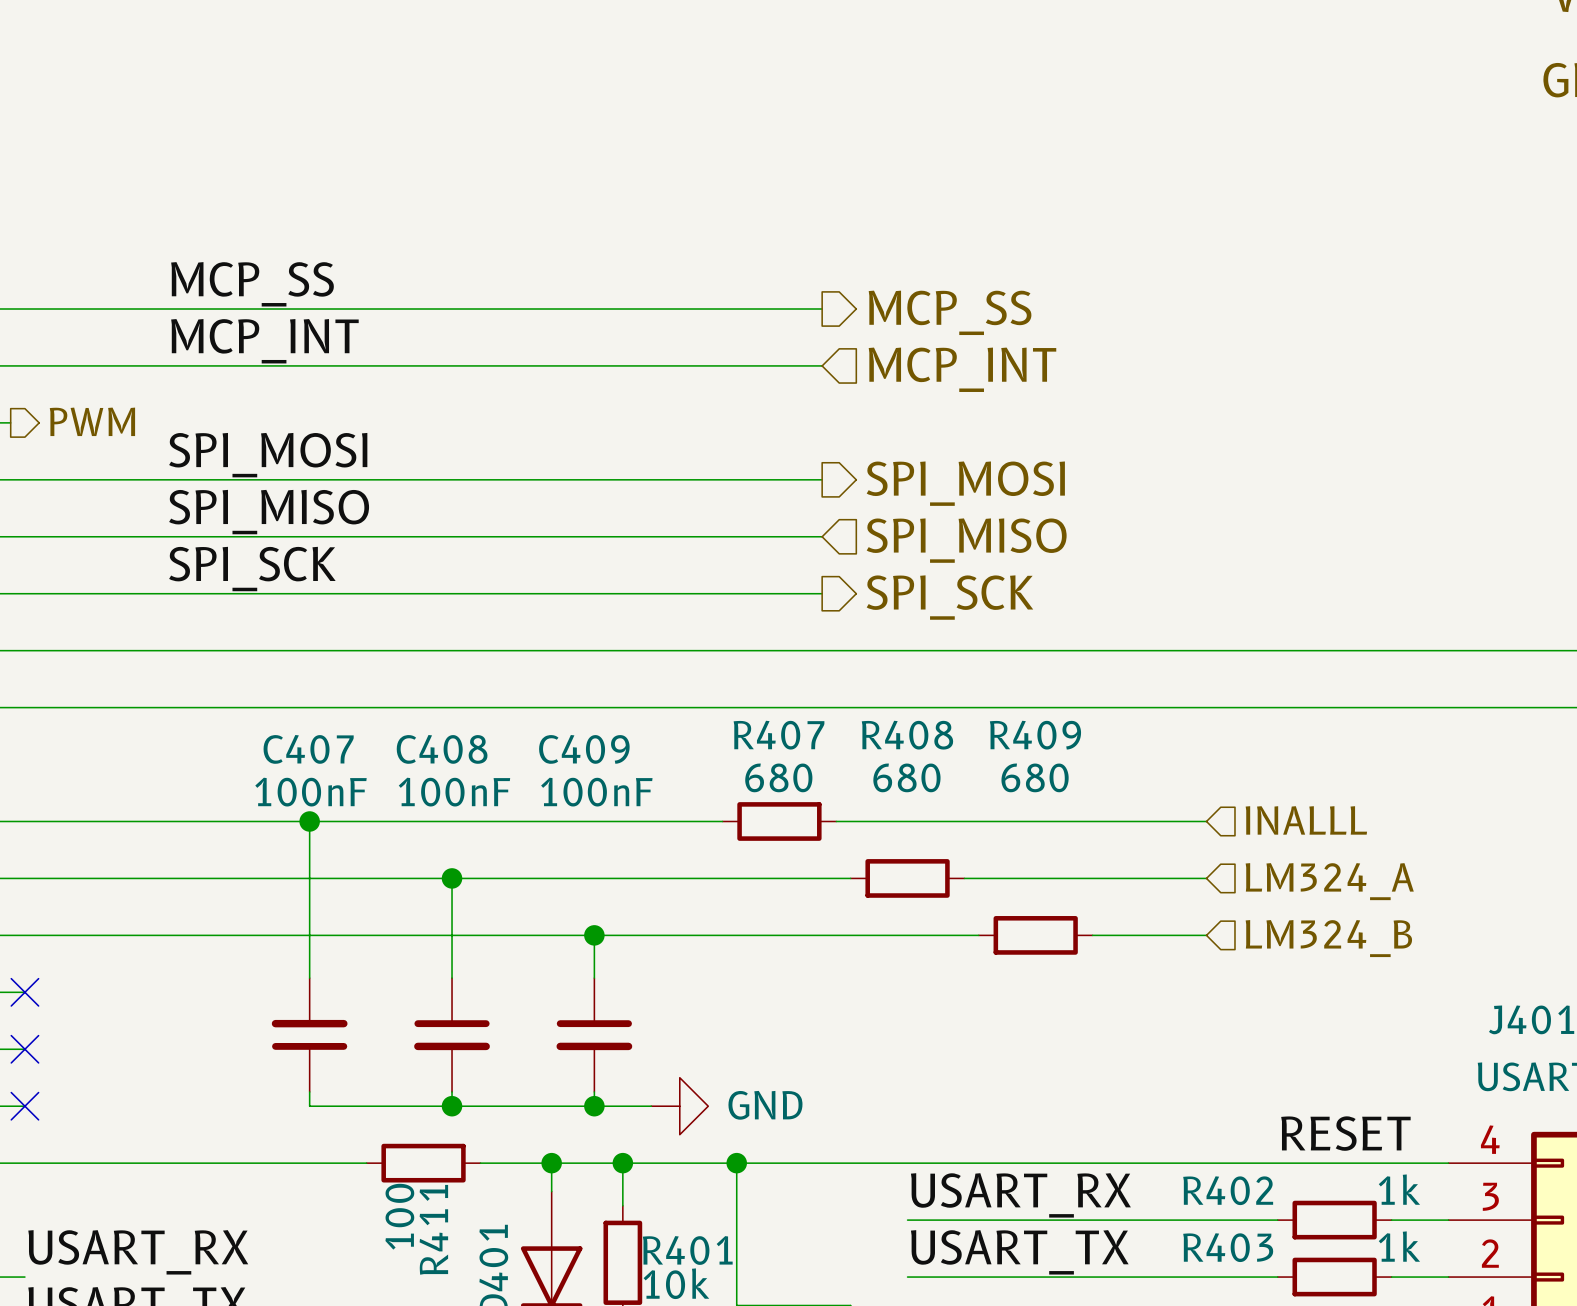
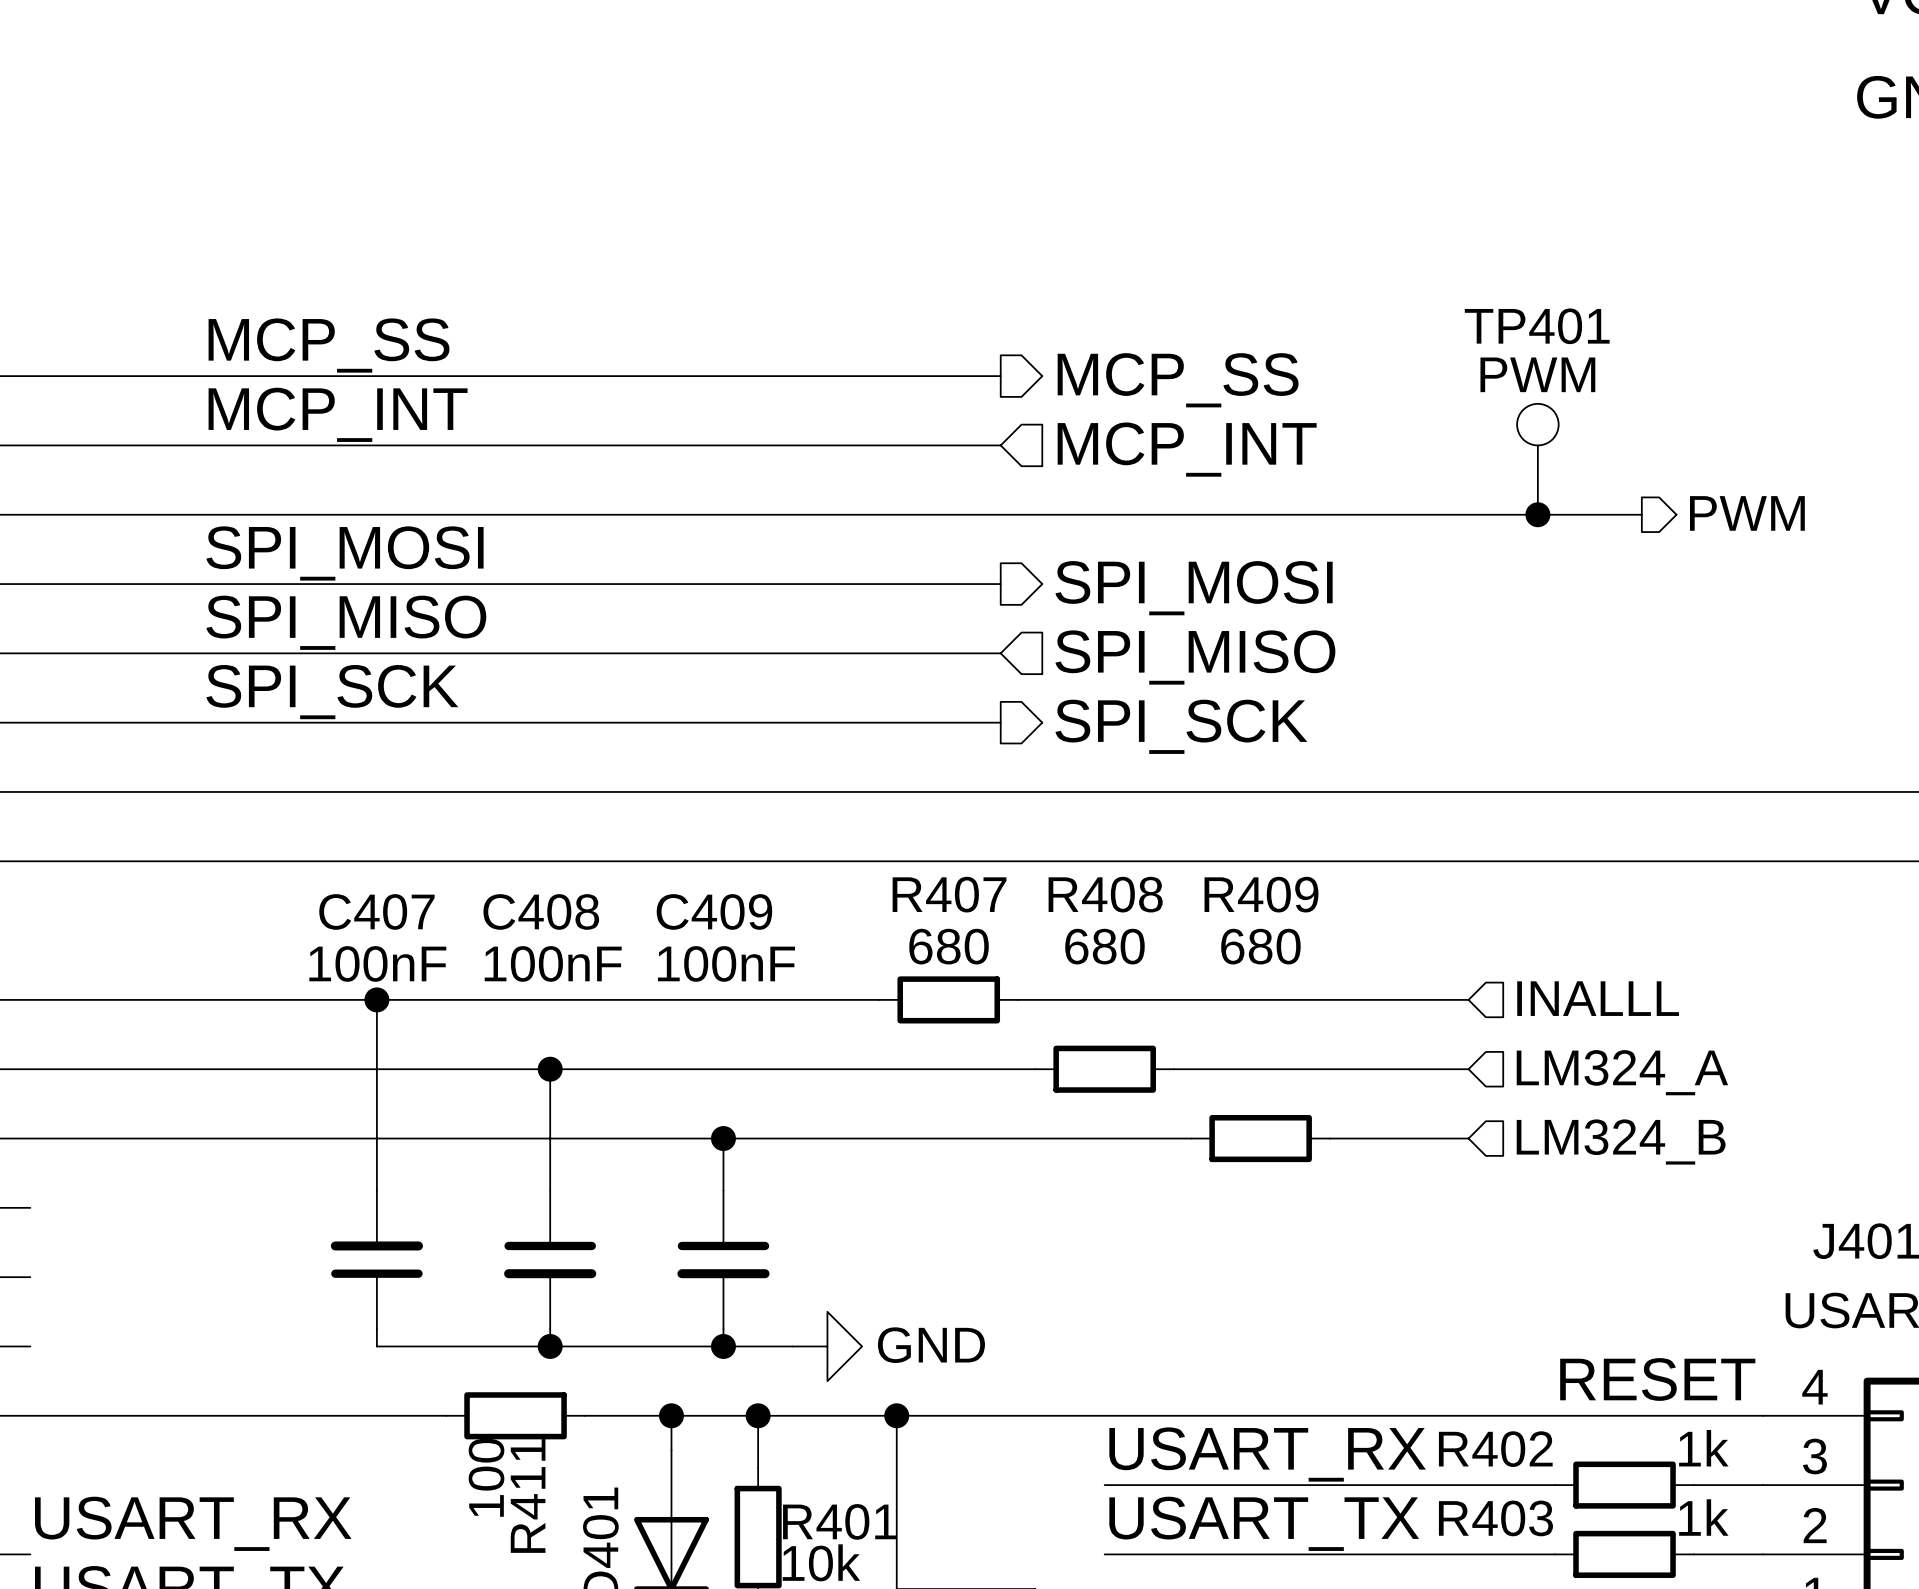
TP401: none -> PWM (1537, 459)
hierarchical label: PWM (92, 421) -> none
hierarchical label: none -> PWM (1747, 513)
wire: none -> (13, 514) (1641, 514)
junction: none -> (1537, 514)
no-connect mark: (24, 992) -> none
no-connect mark: (24, 1049) -> none
no-connect mark: (24, 1106) -> none

